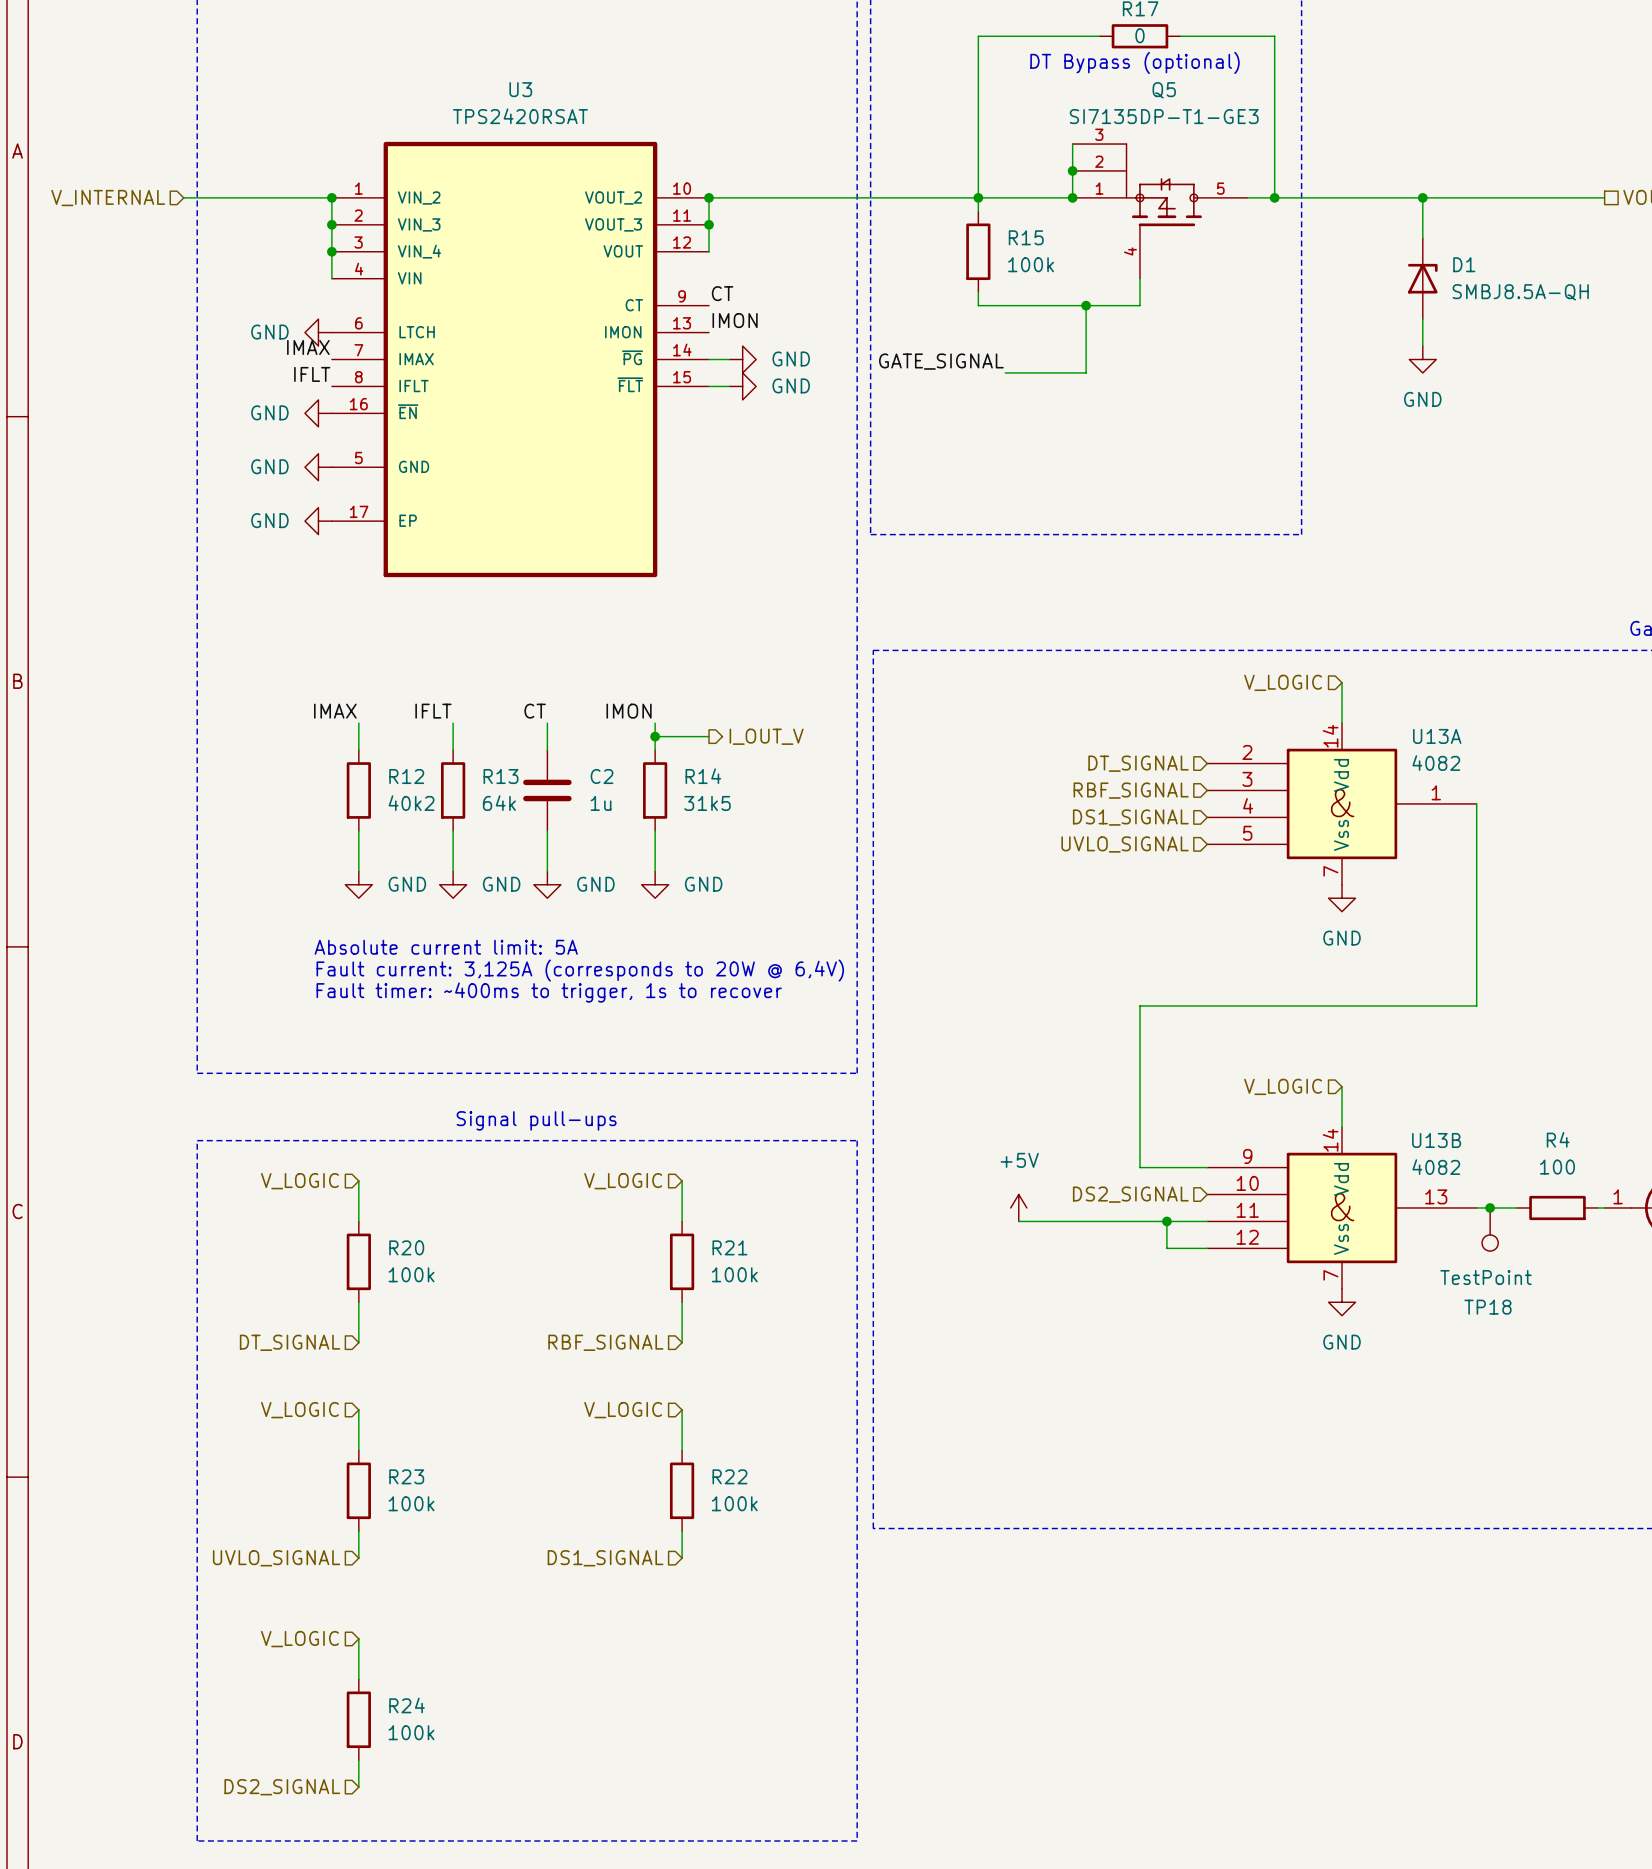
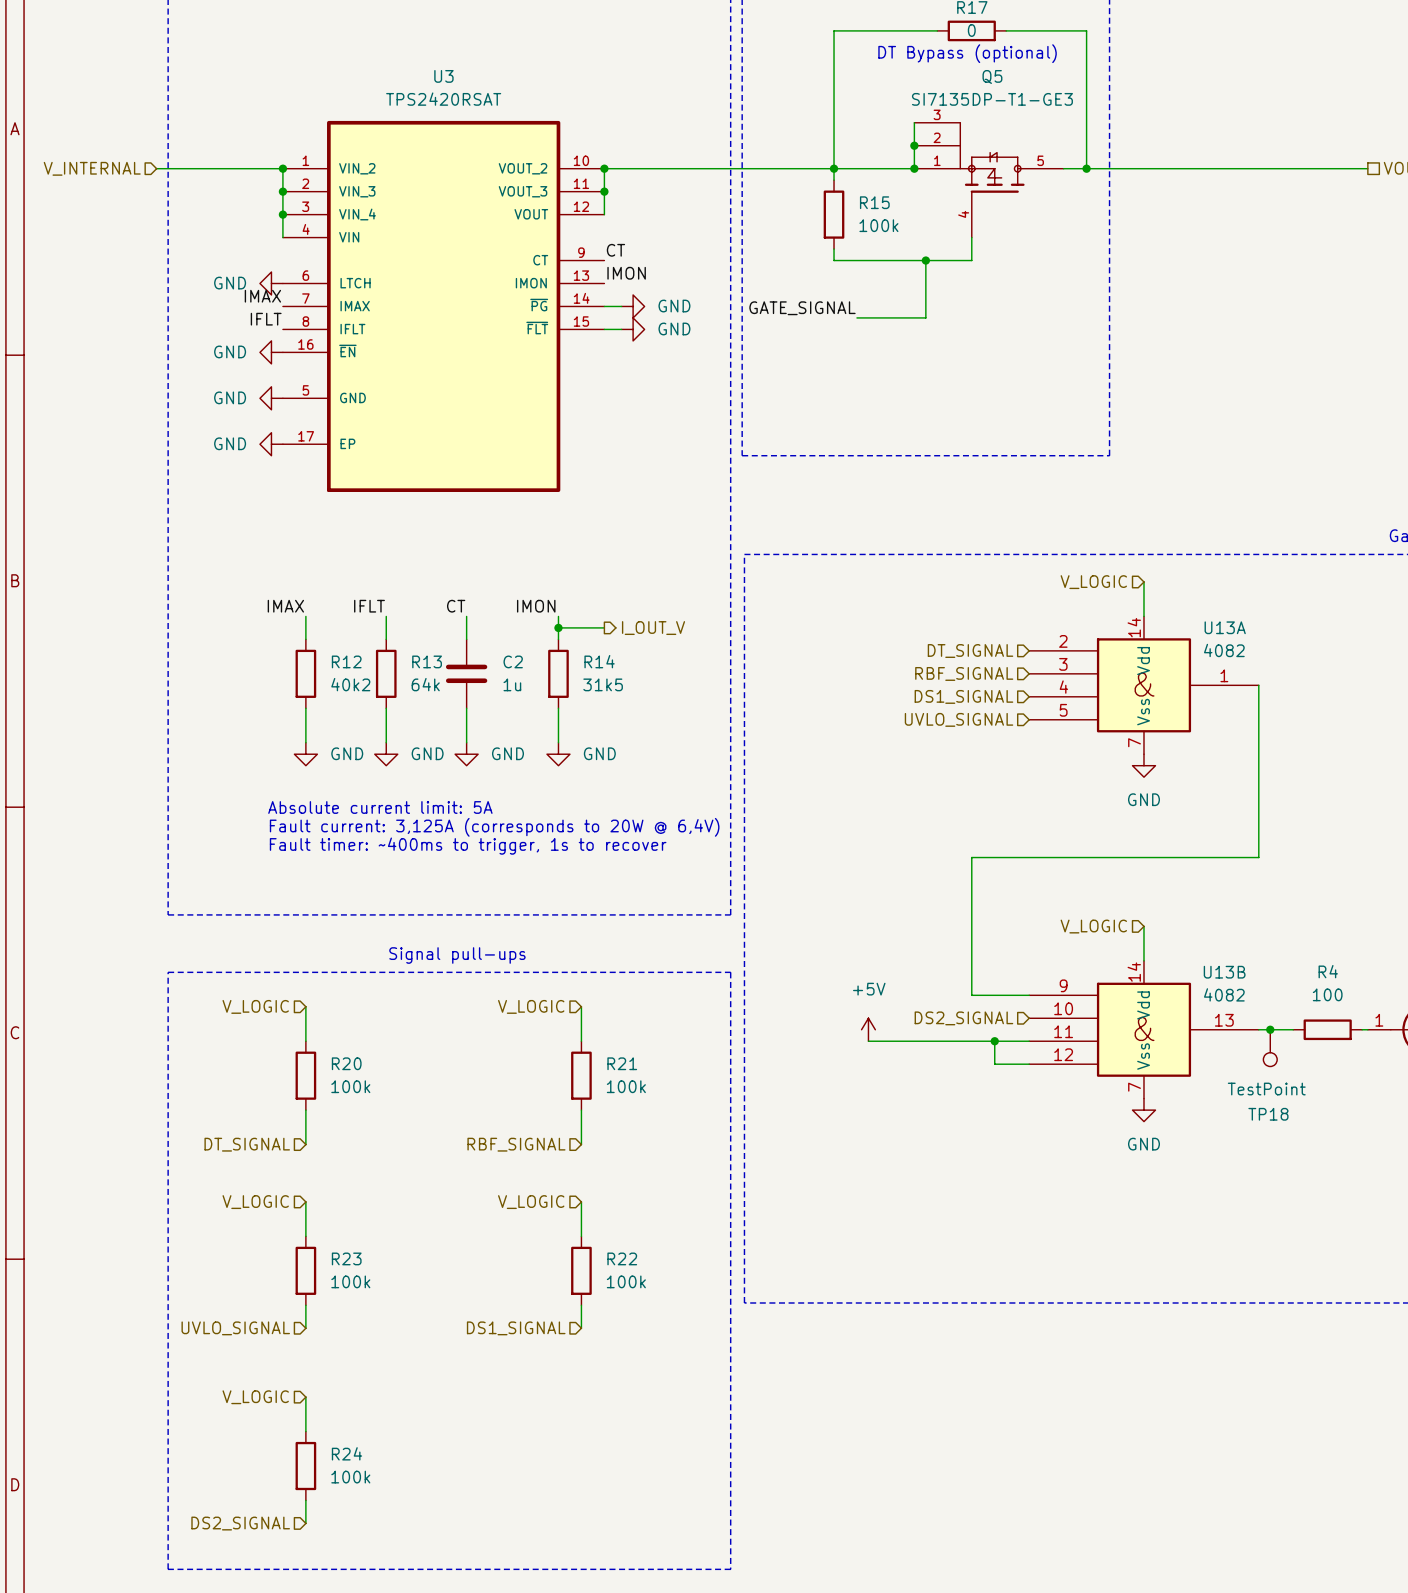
wire: (1422, 197) (1422, 238) -> none
junction: (1422, 197) -> none
D1: SMBJ8.5A-QH (1422, 278) -> none
wire: (1422, 319) (1422, 346) -> none
power symbol: GND (1422, 359) -> none

